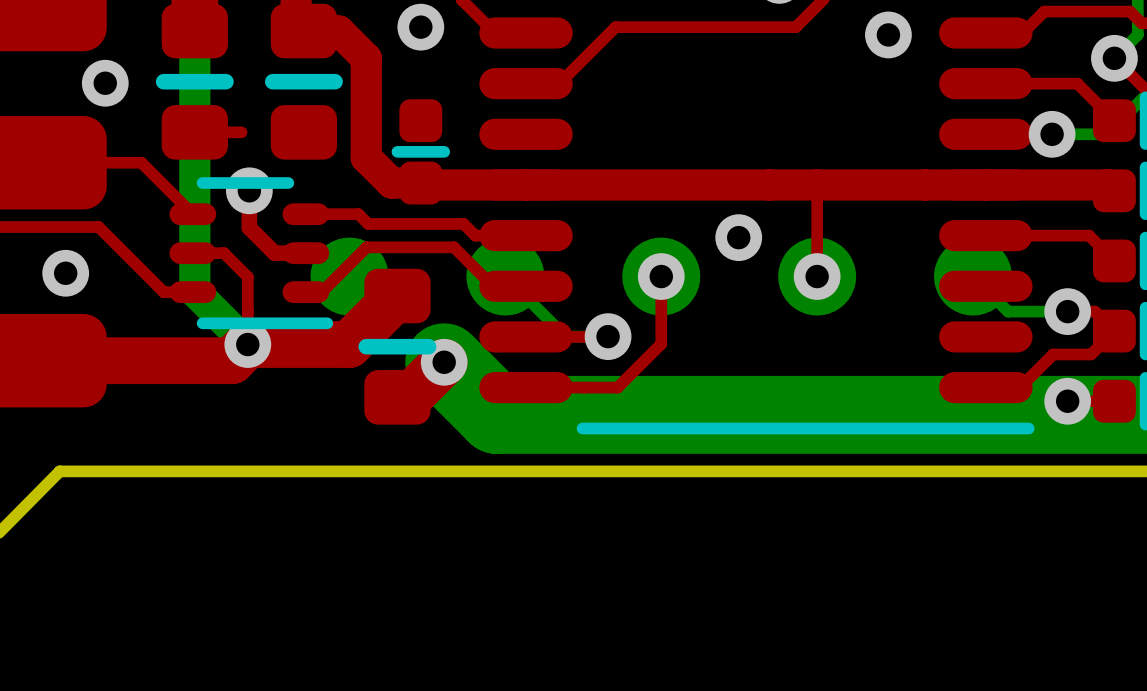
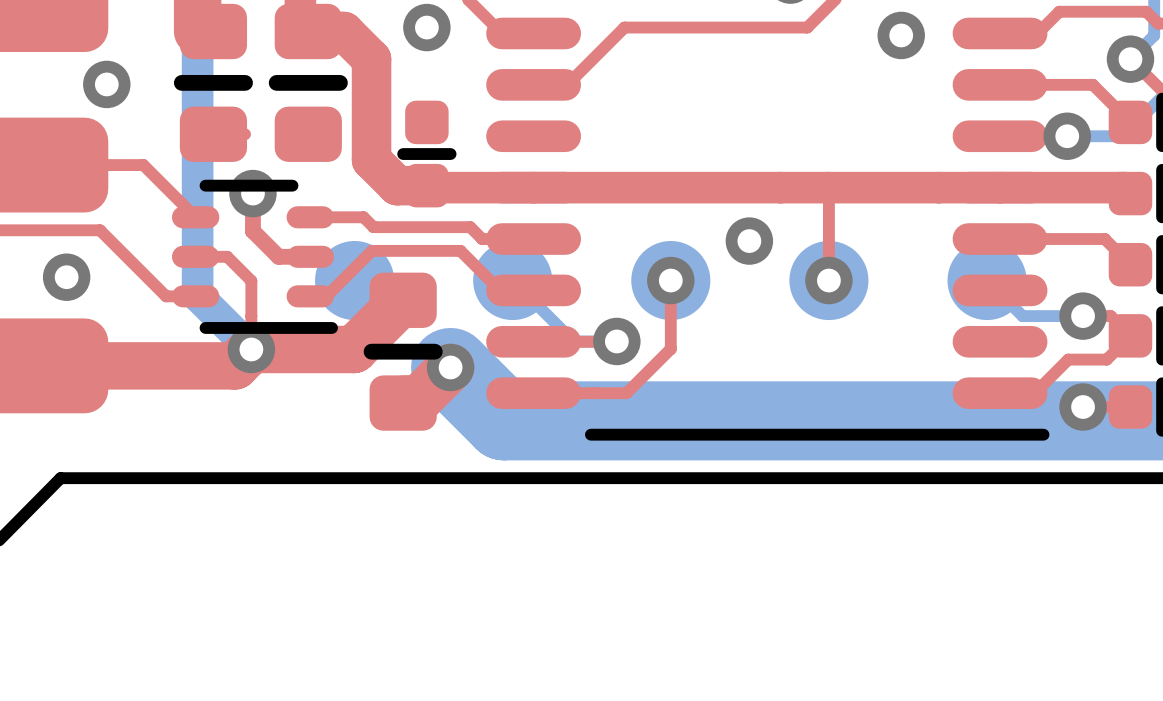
top track width: thin (296, 31) (338, 31) (366, 58) (366, 157) (391, 183) (420, 183) -> thick (300, 31) (343, 31) (371, 59) (371, 159) (397, 185) (426, 185)
part position: (194, 81) -> (213, 82)

